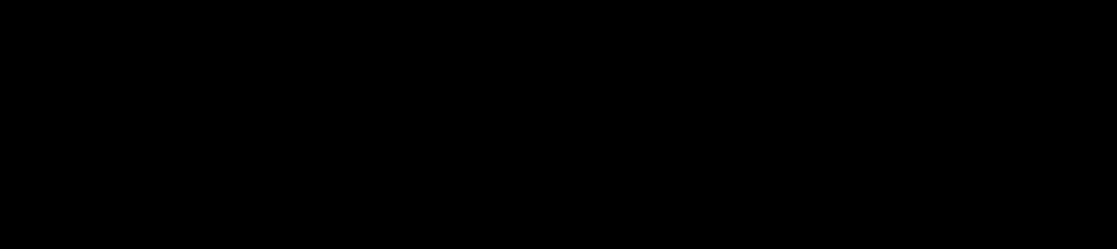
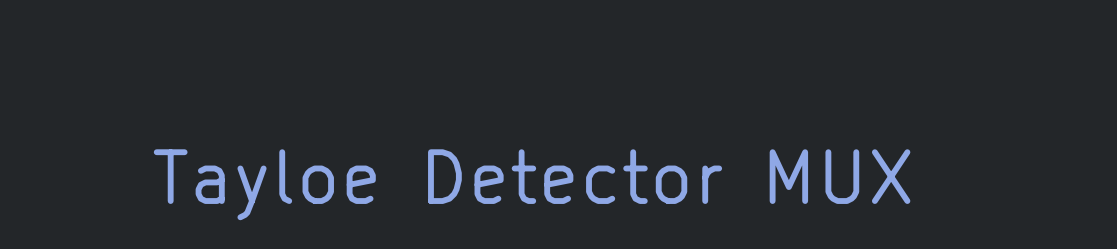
text: none -> Tayloe Detector MUX (532, 184)

